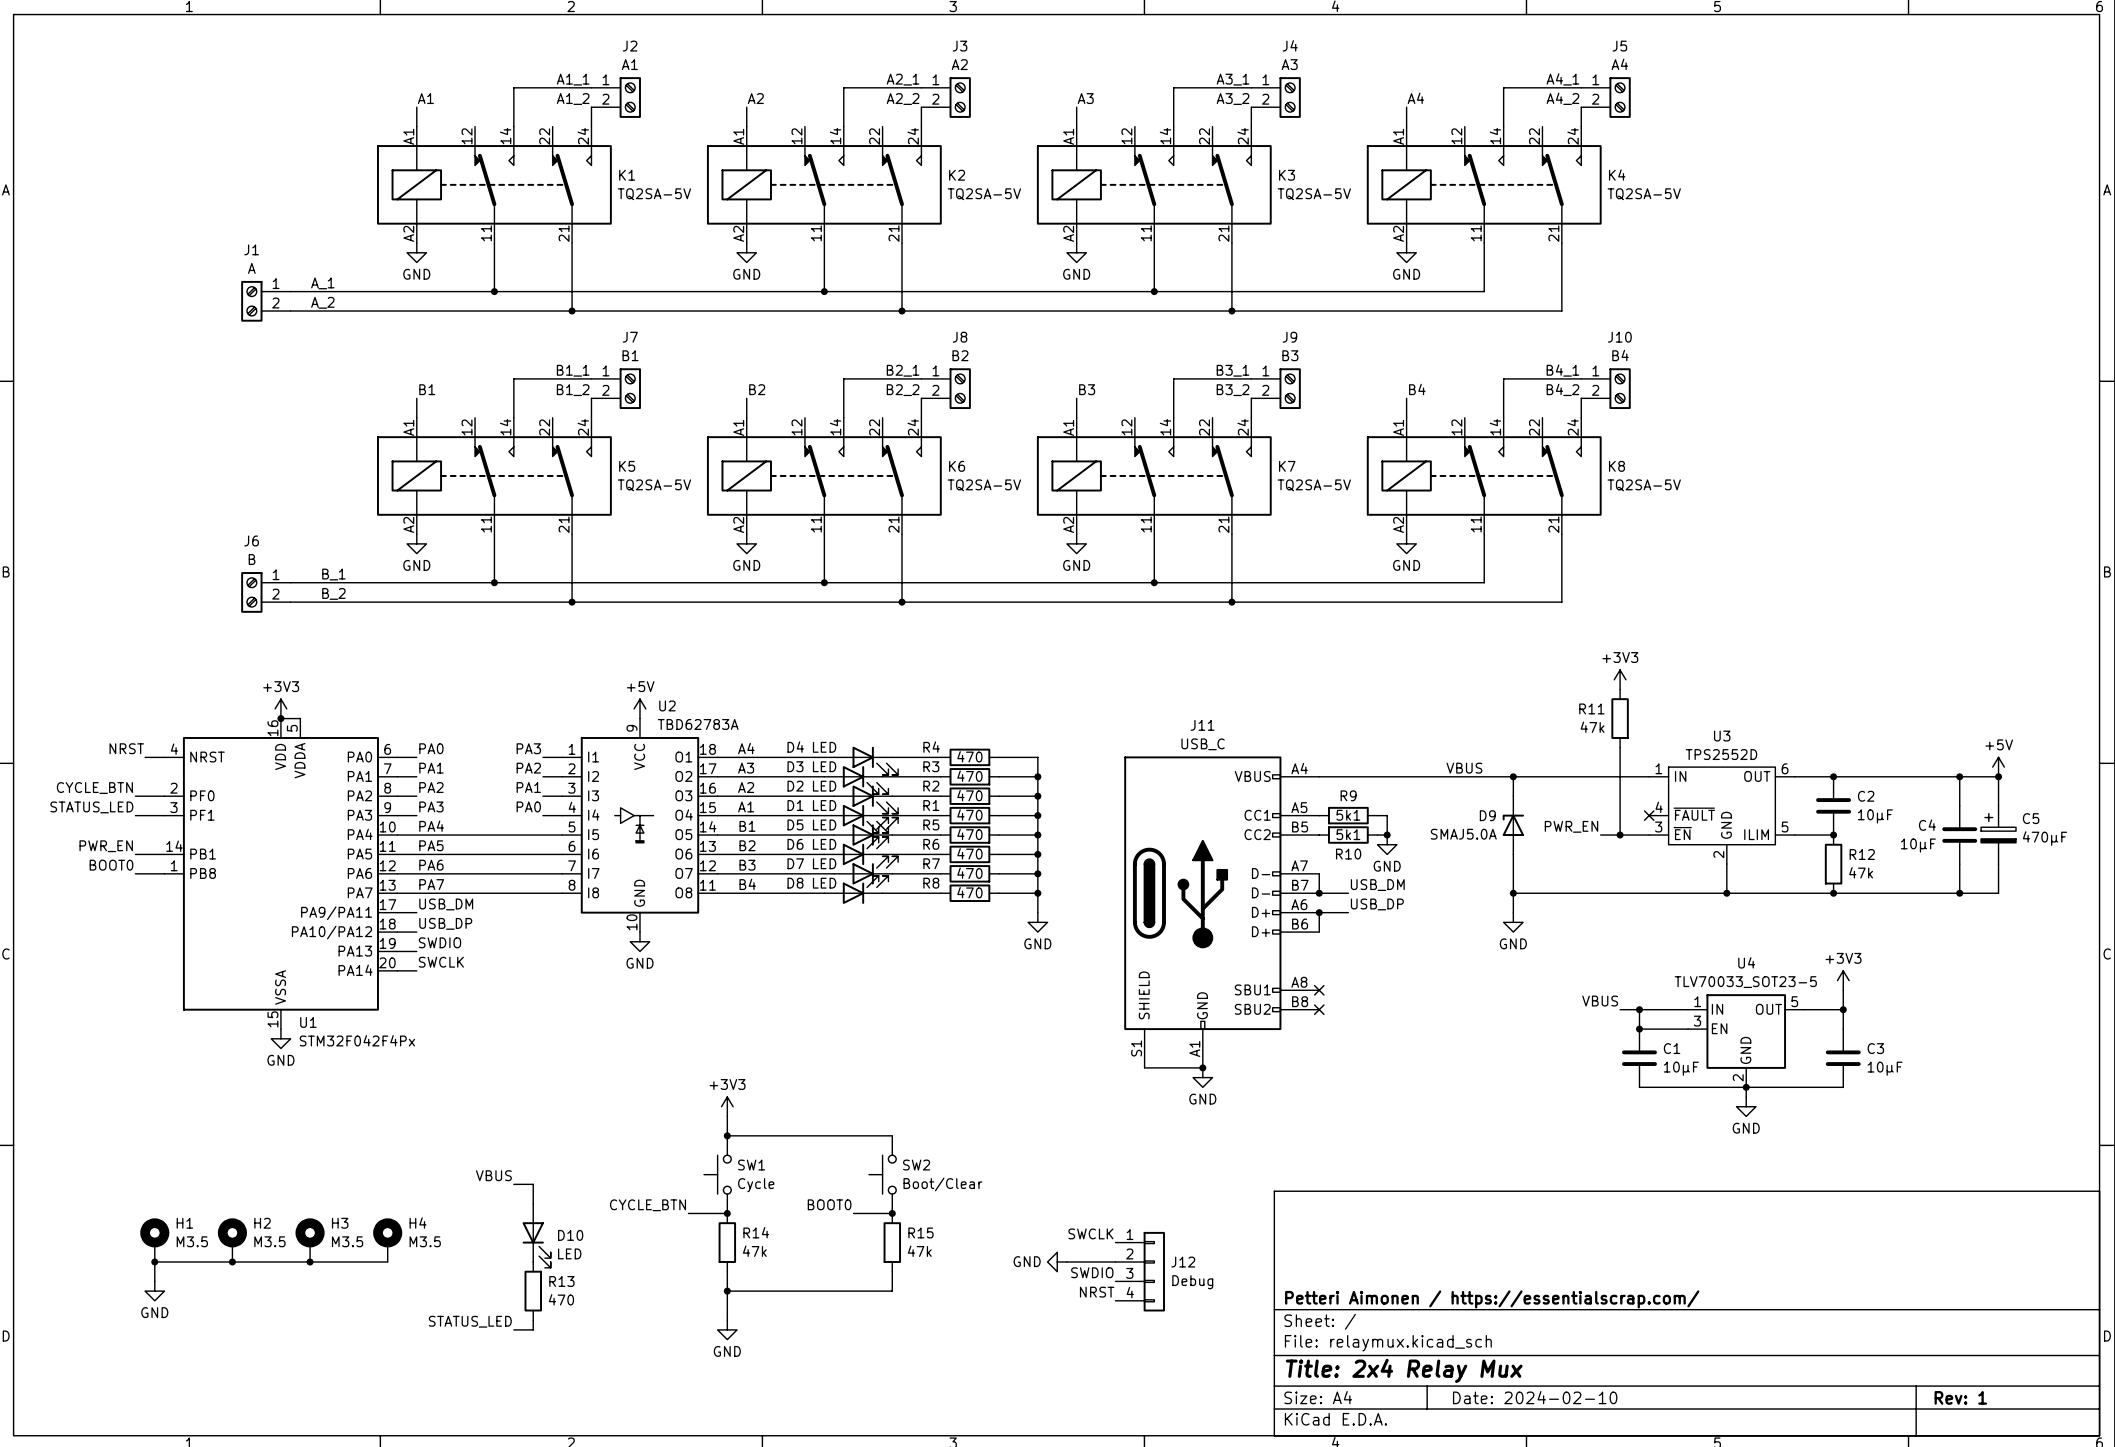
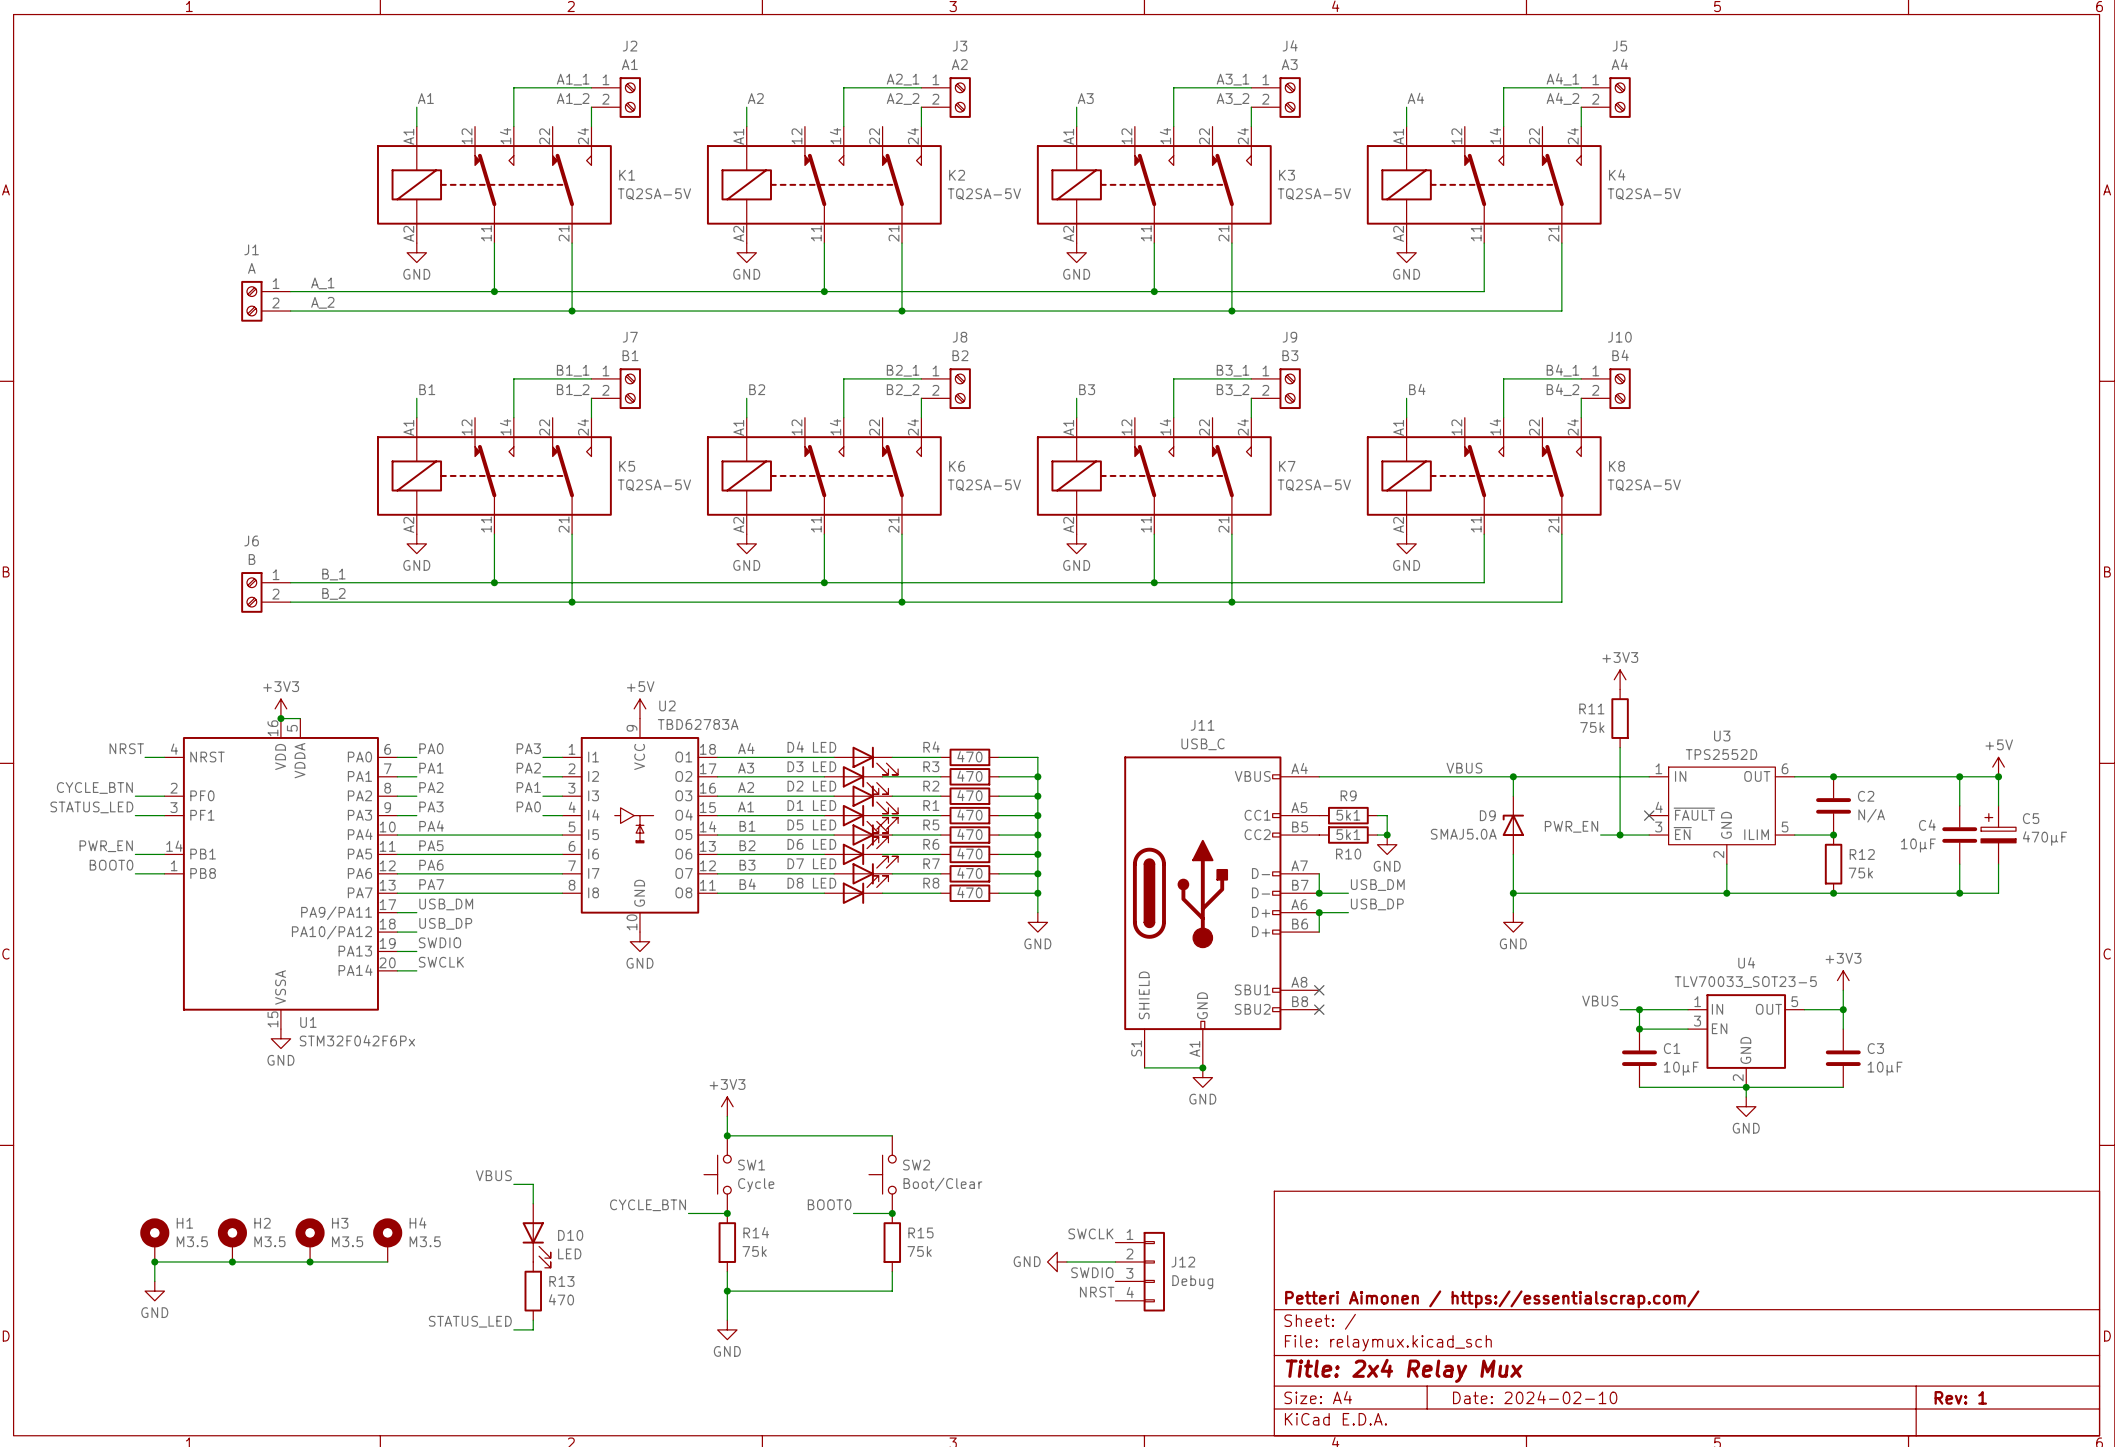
R11 value: 47k (1592, 727) -> 75k (1592, 727)
C2 value: 10µF (1875, 816) -> N/A (1871, 815)
R12 value: 47k (1861, 872) -> 75k (1860, 873)
U1 value: STM32F042F4Px (357, 1040) -> STM32F042F6Px (357, 1040)
R14 value: 47k (754, 1251) -> 75k (754, 1251)
R15 value: 47k (919, 1251) -> 75k (919, 1251)

